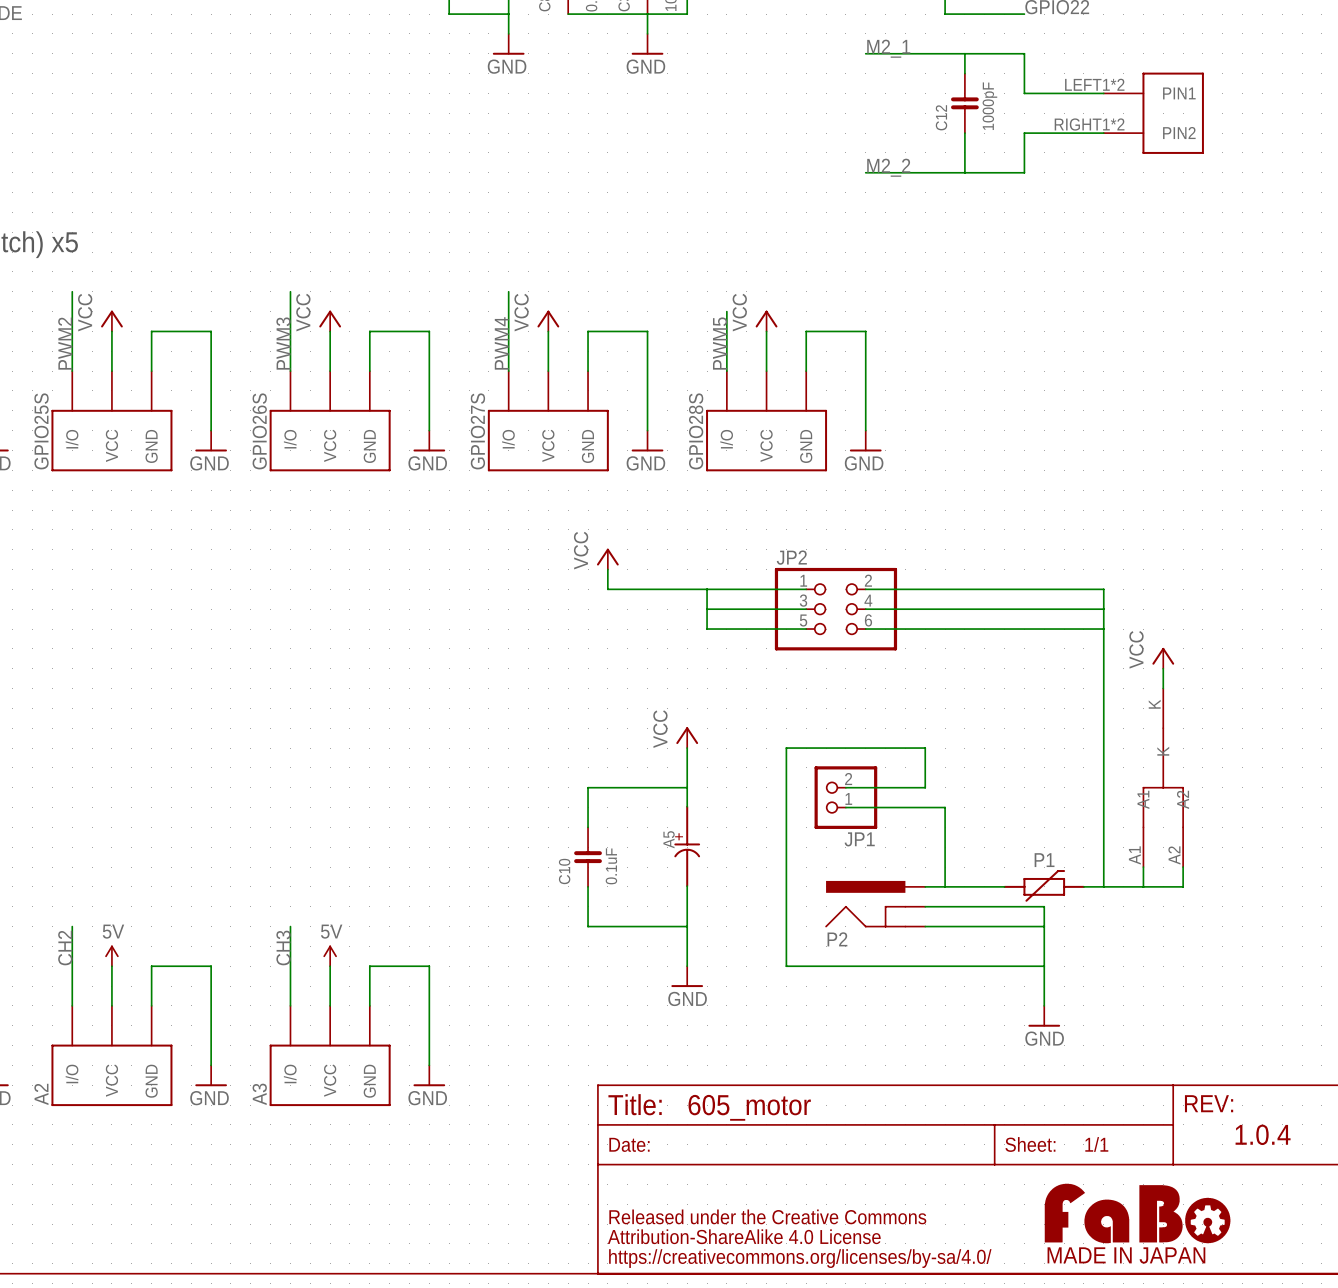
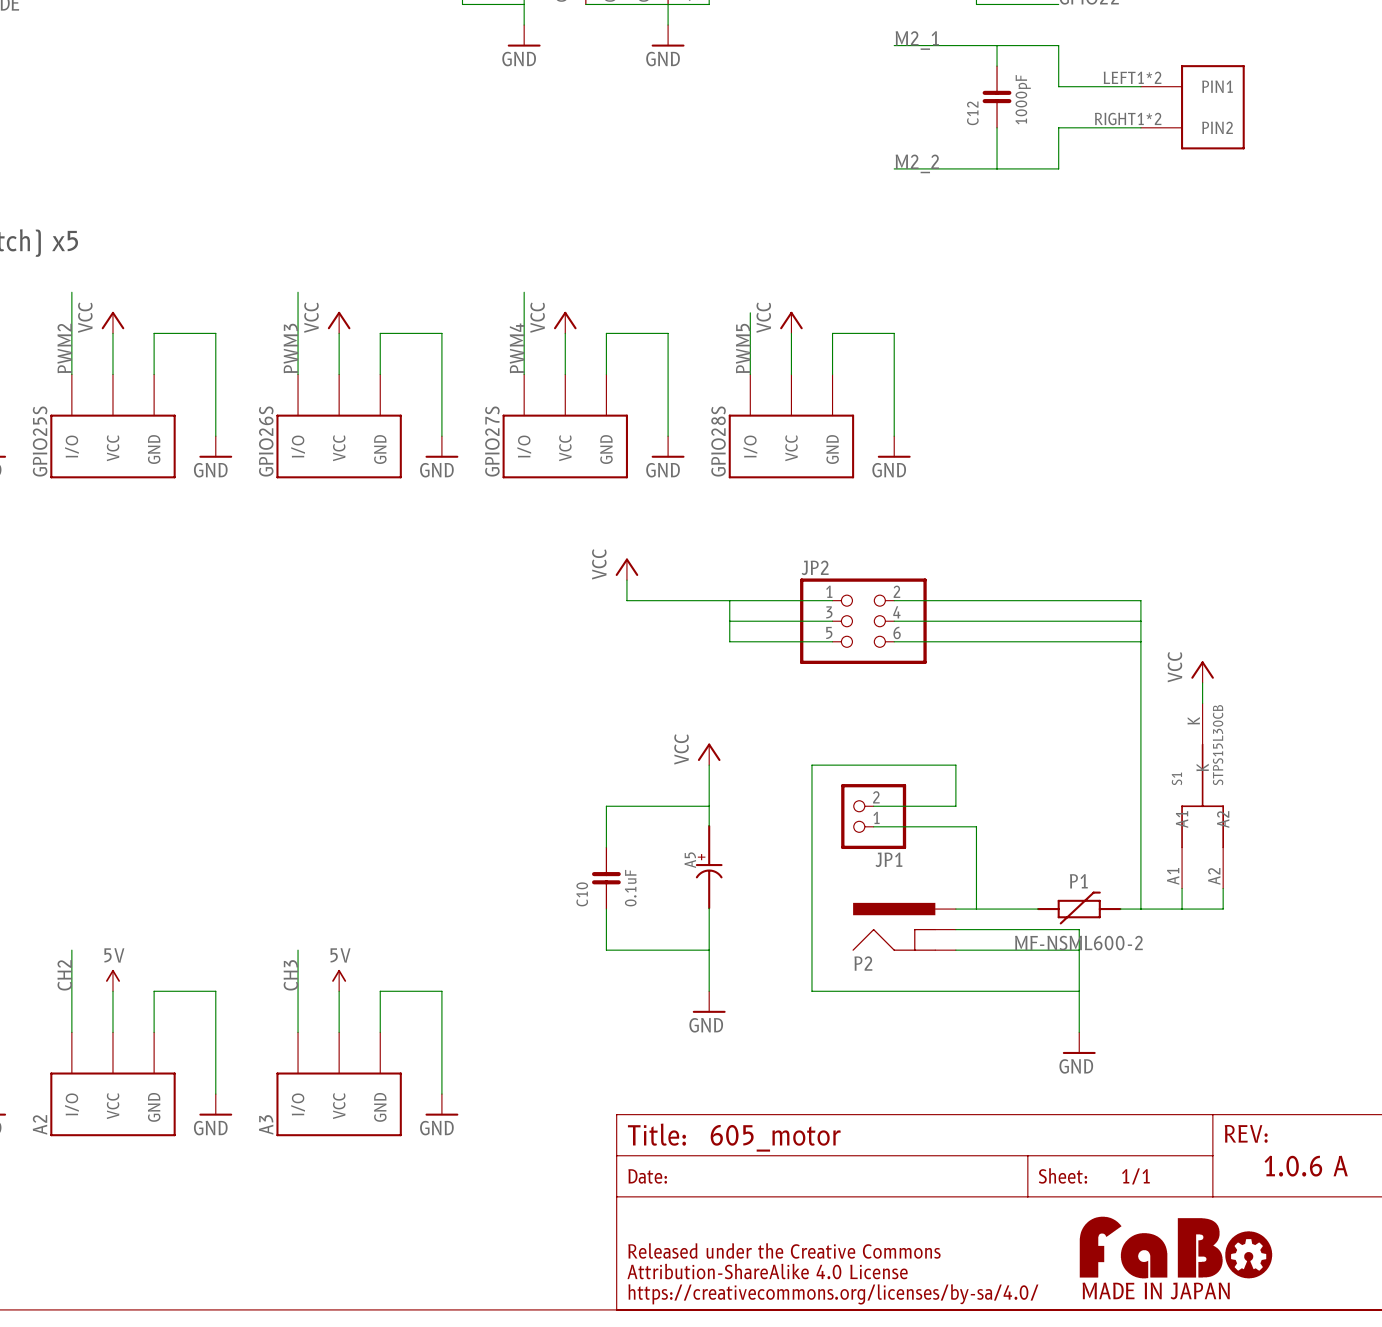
S1 value: none -> STPS15L30CB (1218, 745)
S1 name: none -> S1 (1176, 778)
P1 value: none -> MF-NSML600-2 (1078, 943)
text: 1.0.4 (1263, 1134) -> 1.0.6 A (1306, 1166)

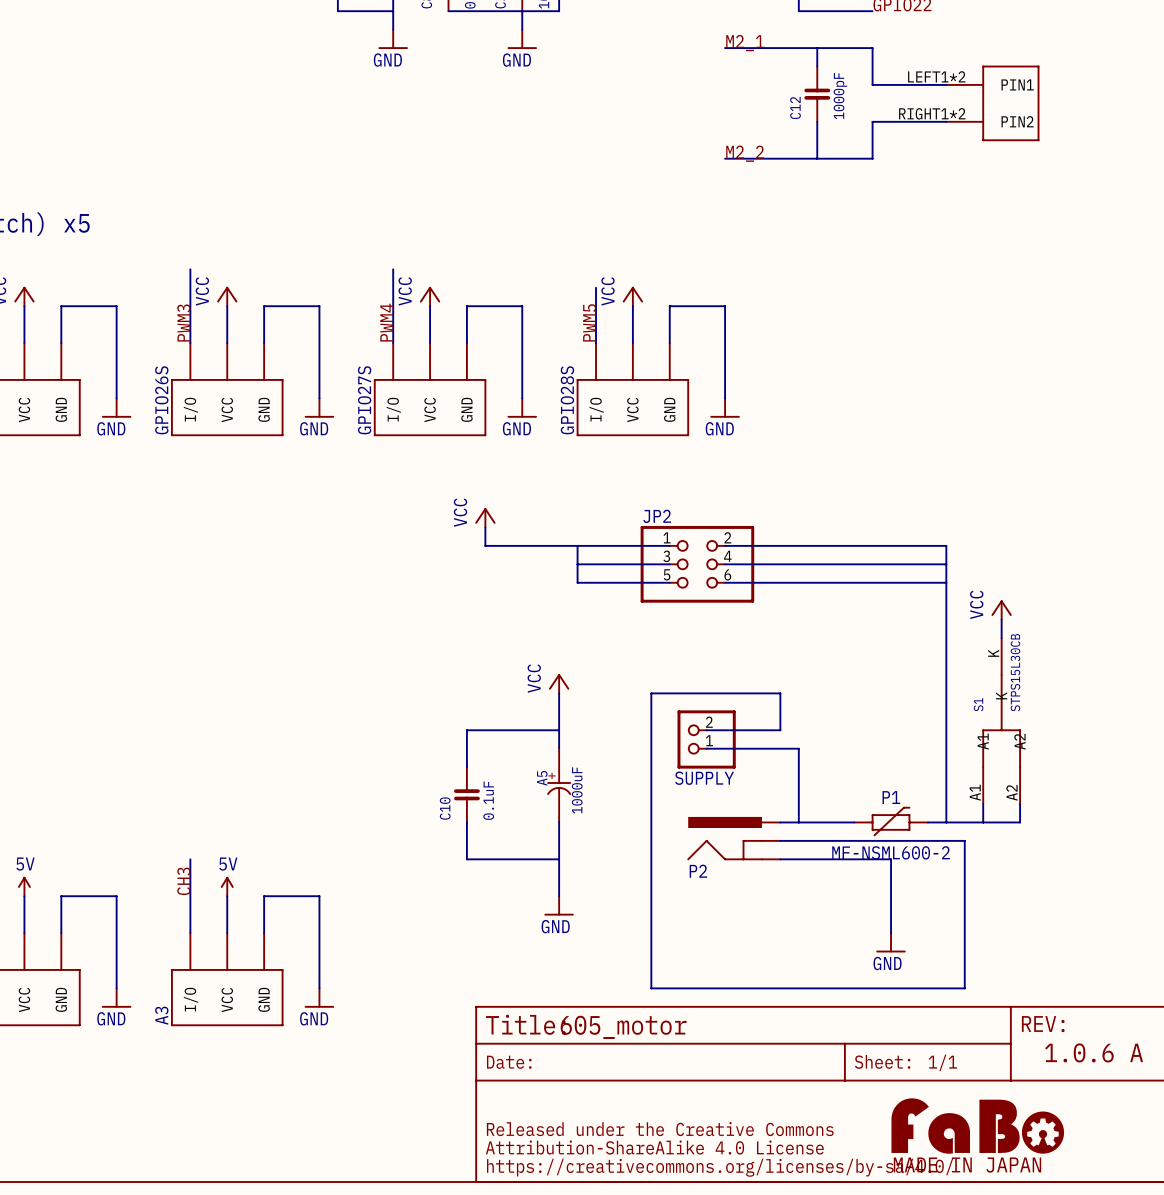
JP1 name: JP1 (888, 859) -> SUPPLY (704, 778)
A5 value: none -> 1000uF (577, 790)
wire: (1079, 929) (1079, 950) -> none
wire: (811, 991) (1079, 991) -> (651, 896) (651, 988) (964, 988) (964, 840) (891, 840)

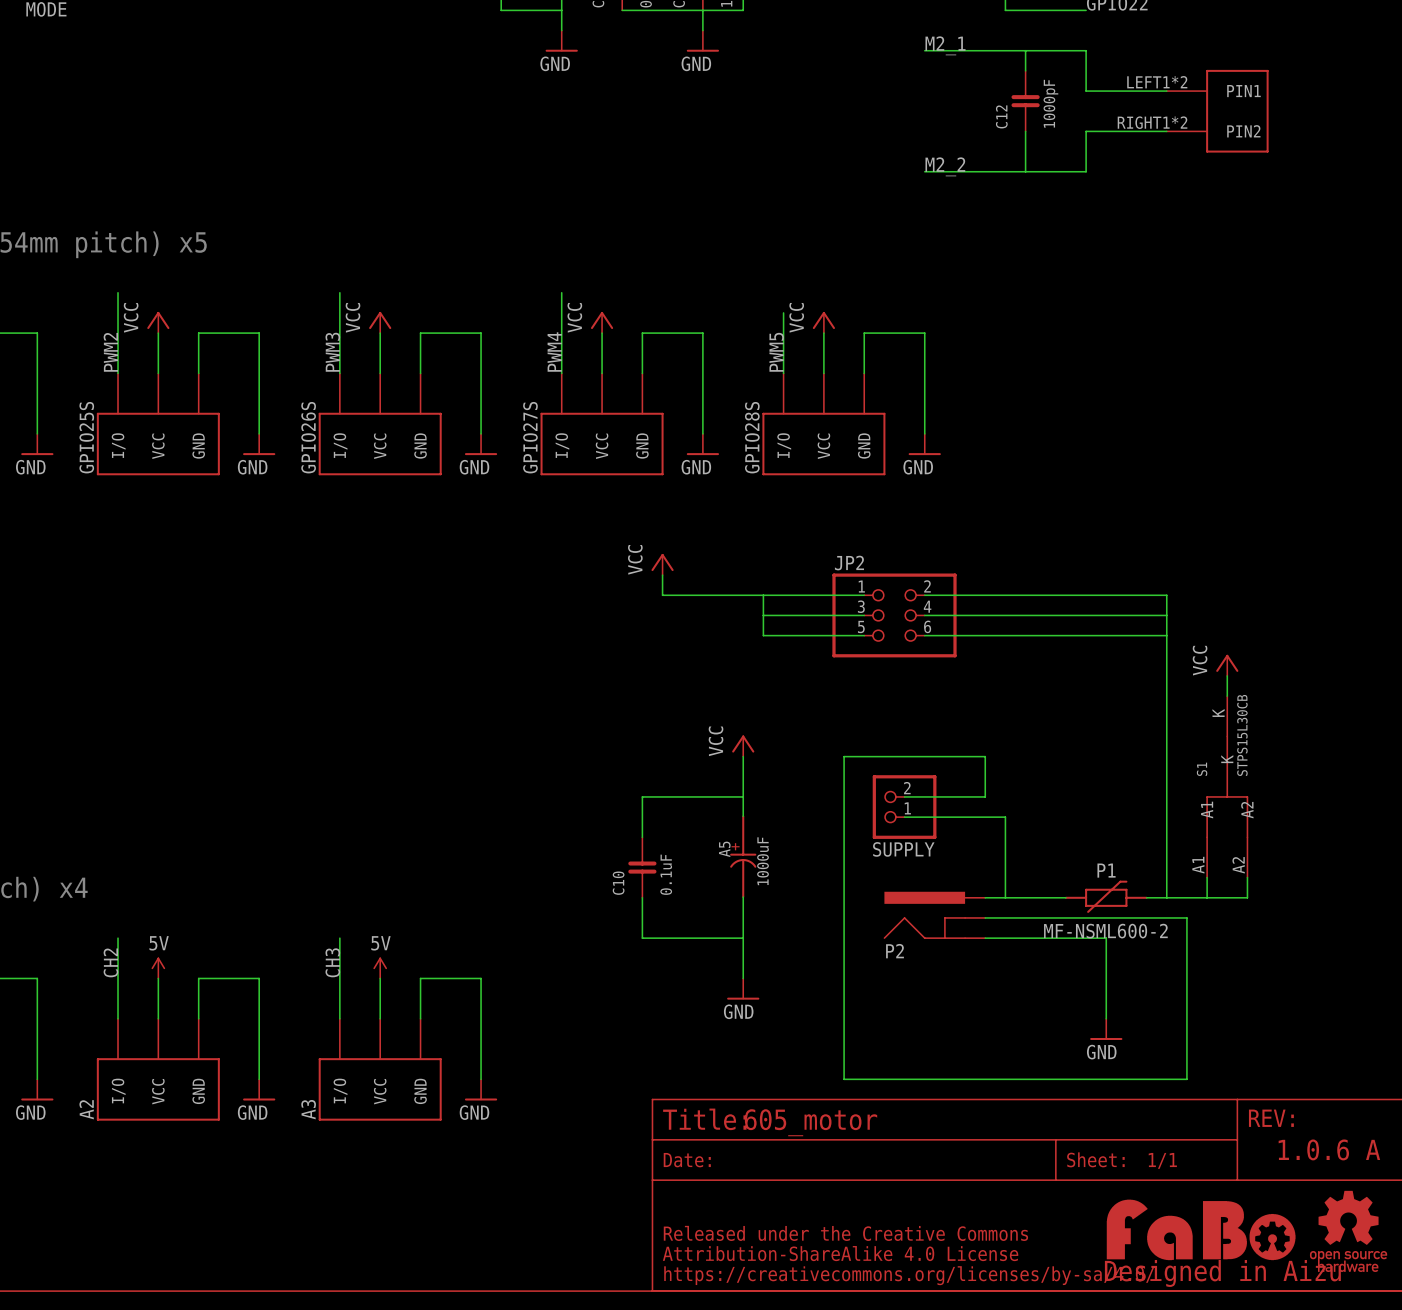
part: none -> (1348, 1231)
part text: MADE IN JAPAN (967, 1165) -> none
part text: none -> Designed in Aizu (1222, 1273)

